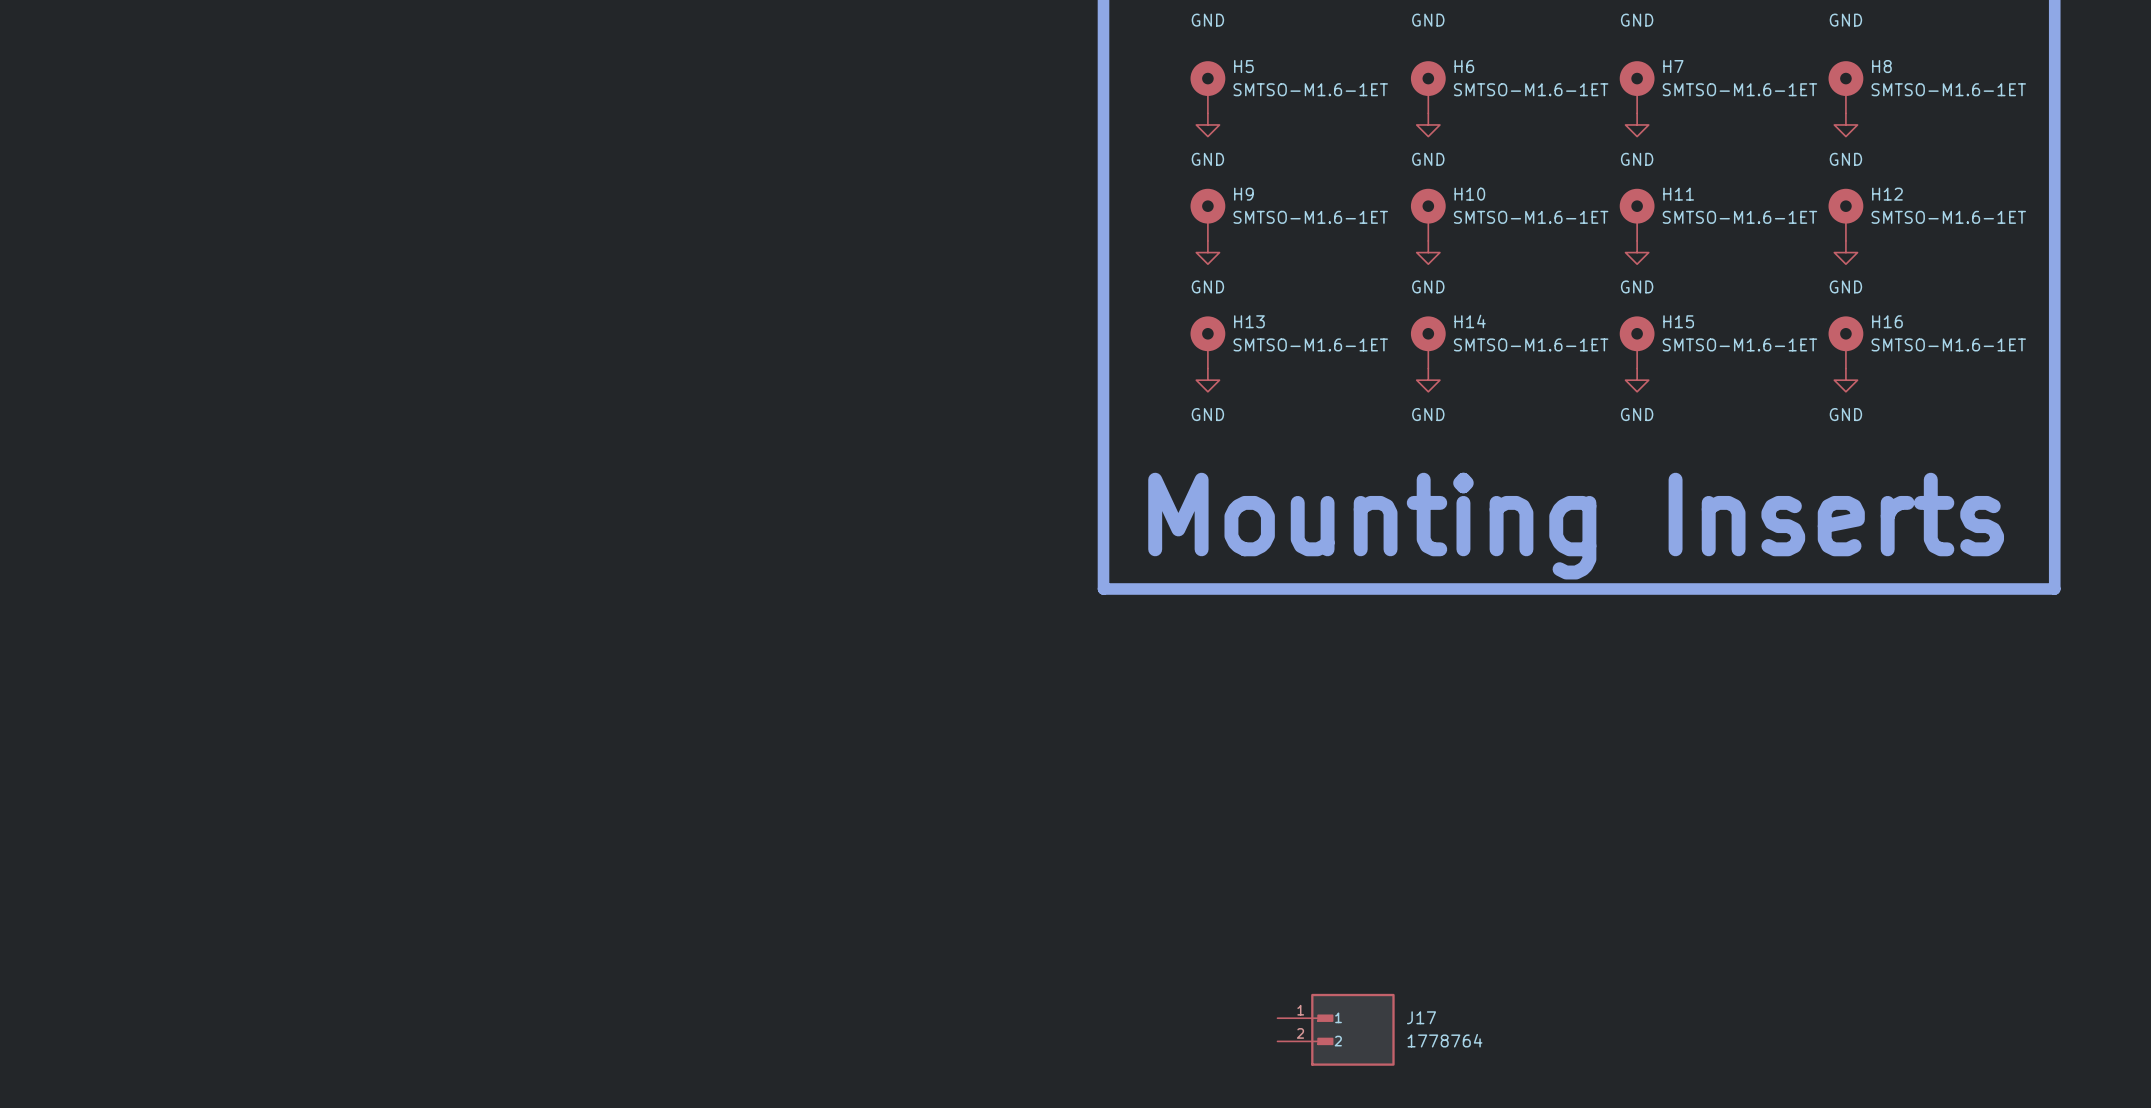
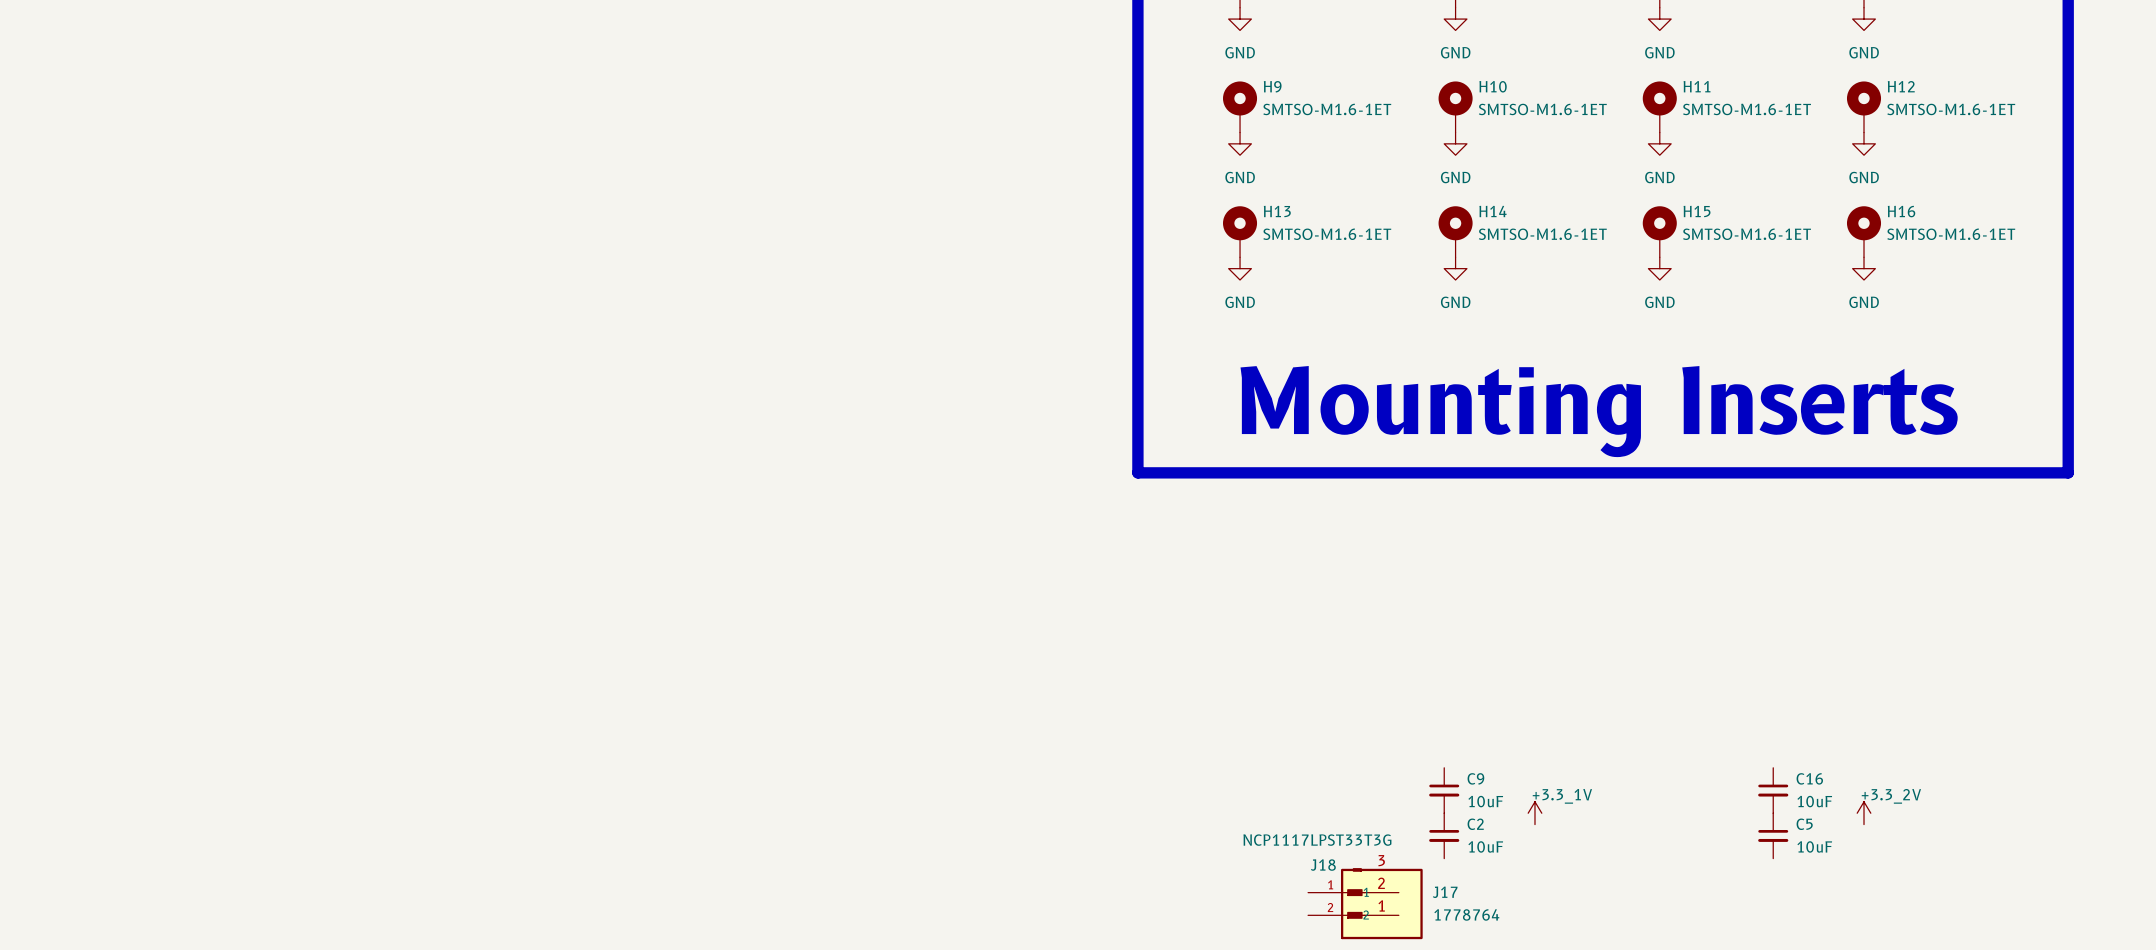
C9: none -> 10uF (1444, 790)
C16: none -> 10uF (1773, 790)
power symbol: none -> +3.3_1V (1534, 813)
power symbol: none -> +3.3_2V (1864, 813)
C2: none -> 10uF (1444, 835)
C5: none -> 10uF (1773, 835)
J18: none -> NCP1117LPST33T3G (1375, 892)

